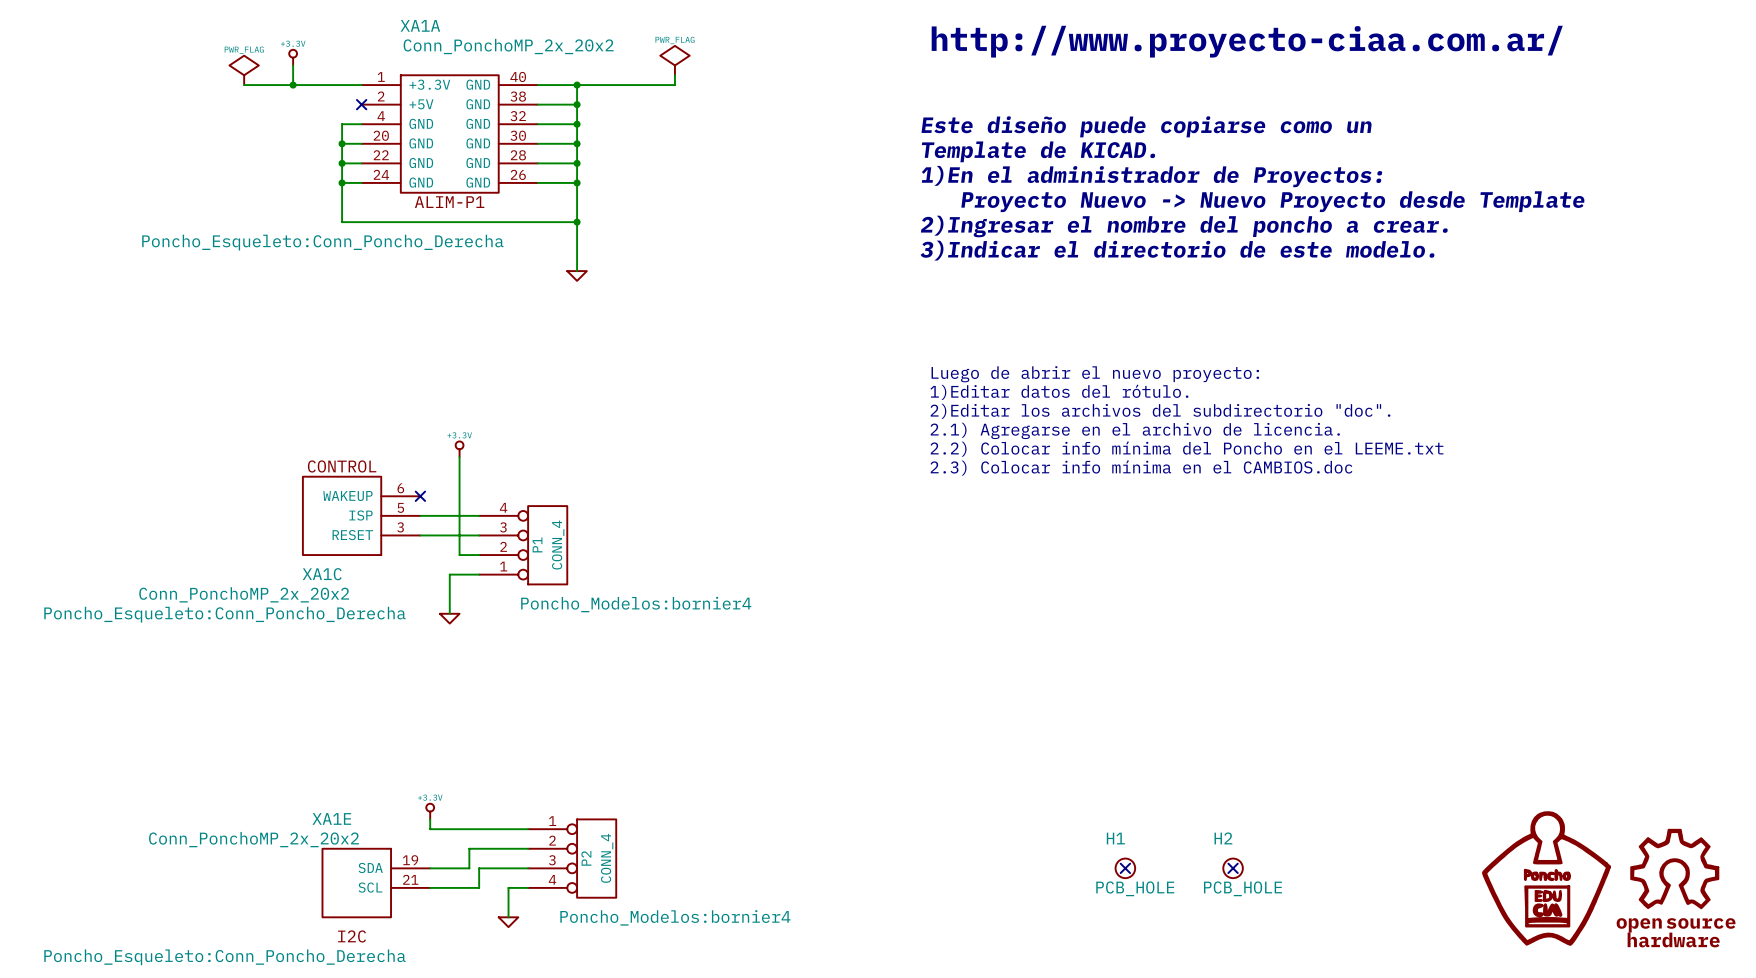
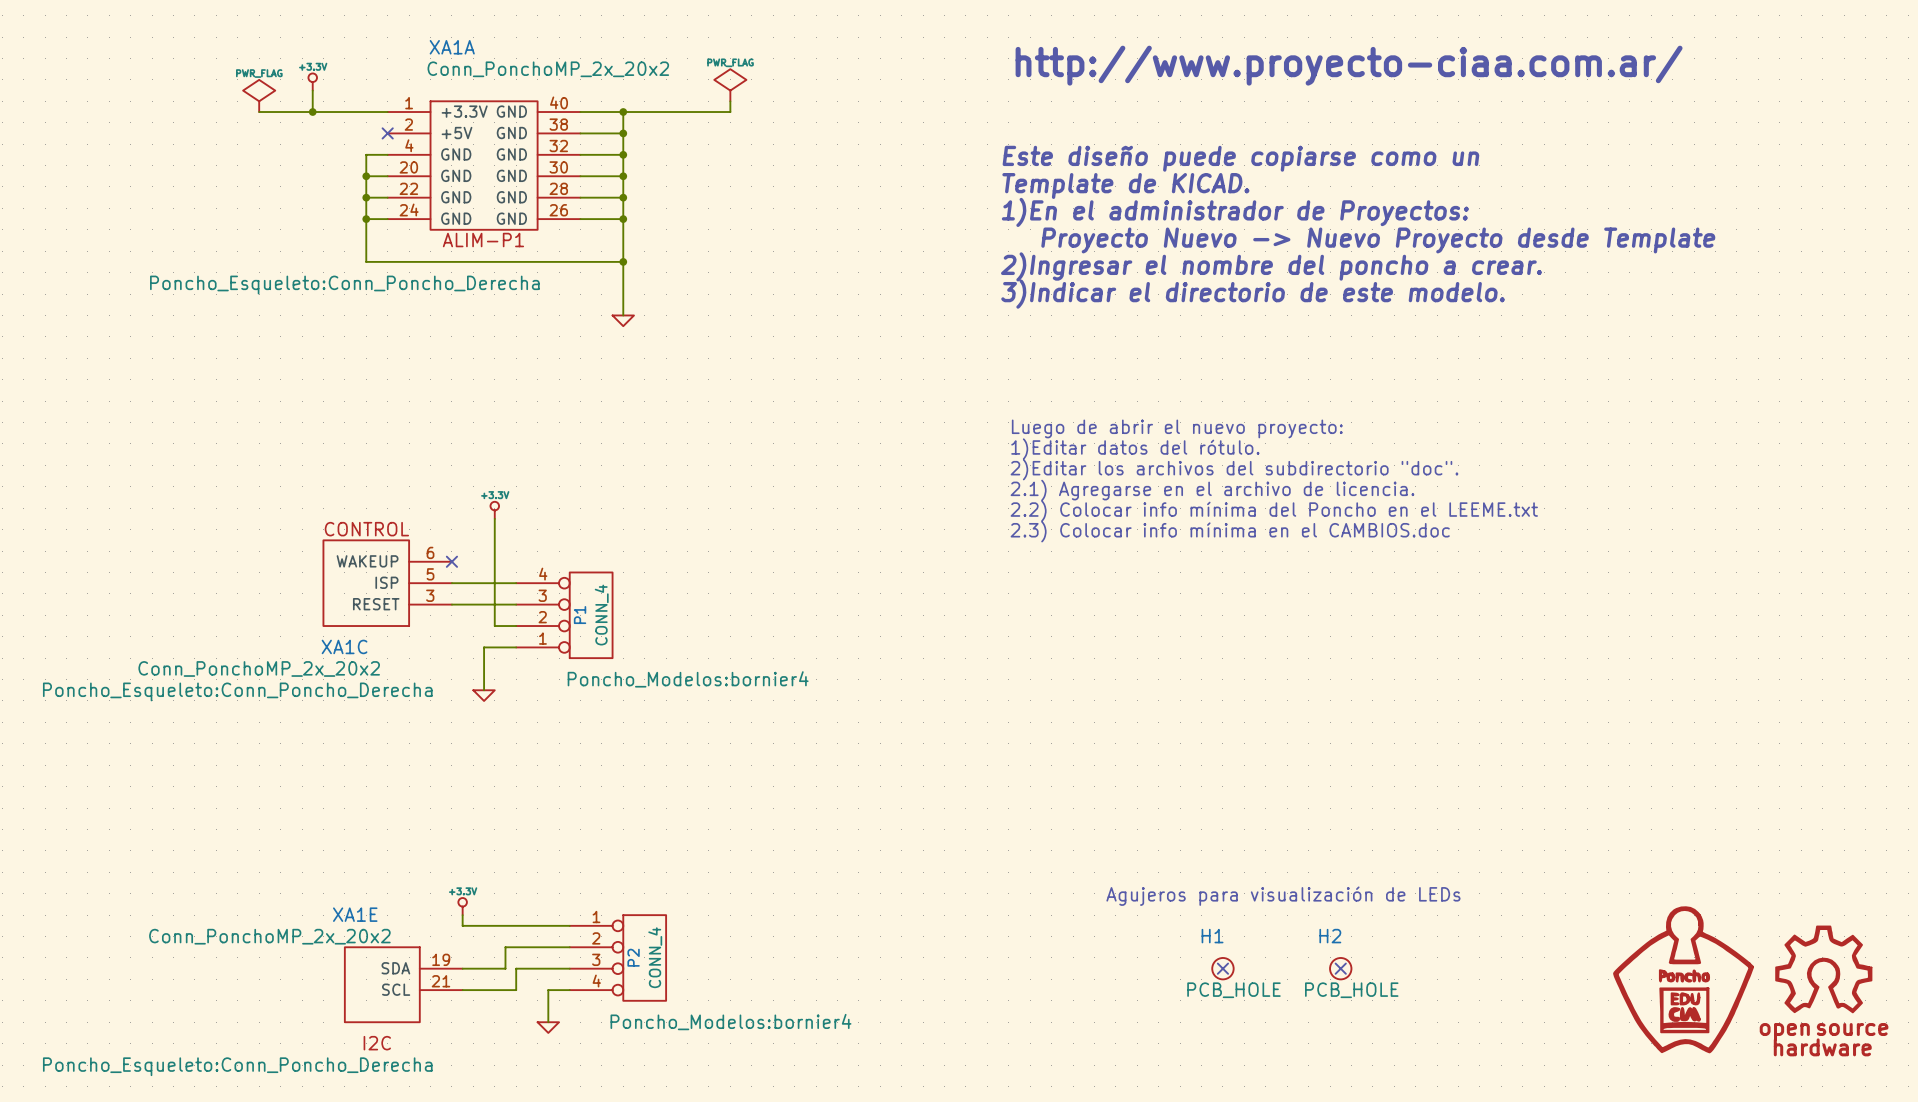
text: none -> Agujeros para visualización de LEDs (1283, 896)

